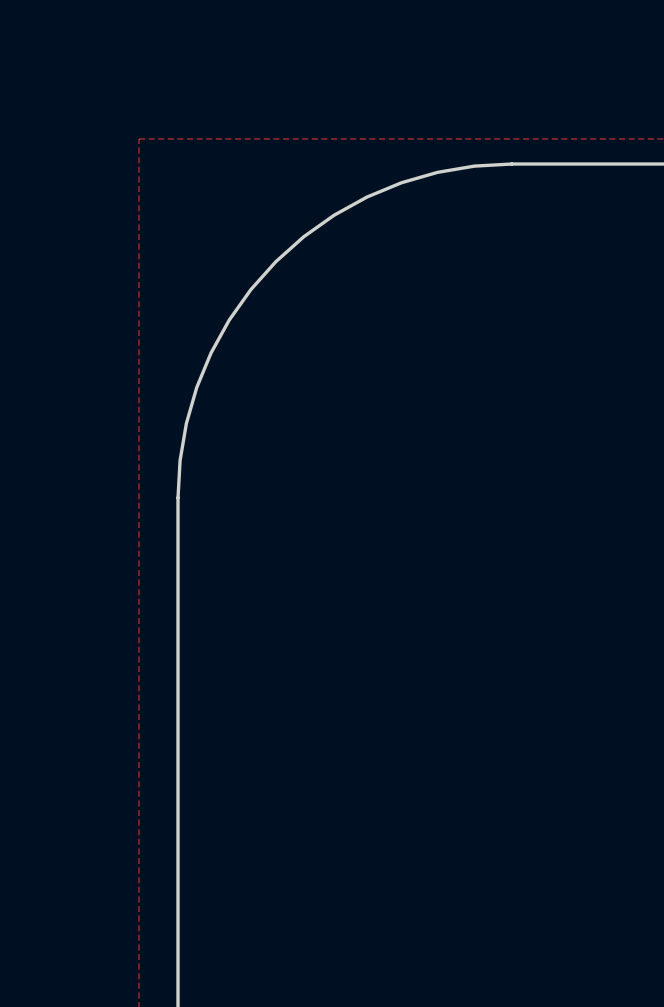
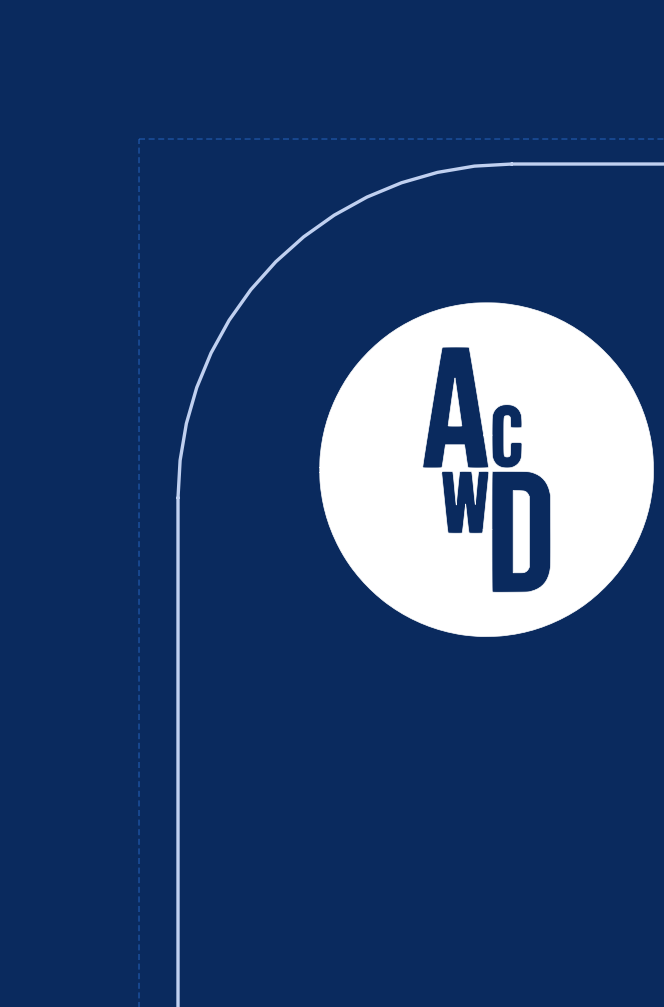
drawing: none -> [319, 302, 654, 637]

